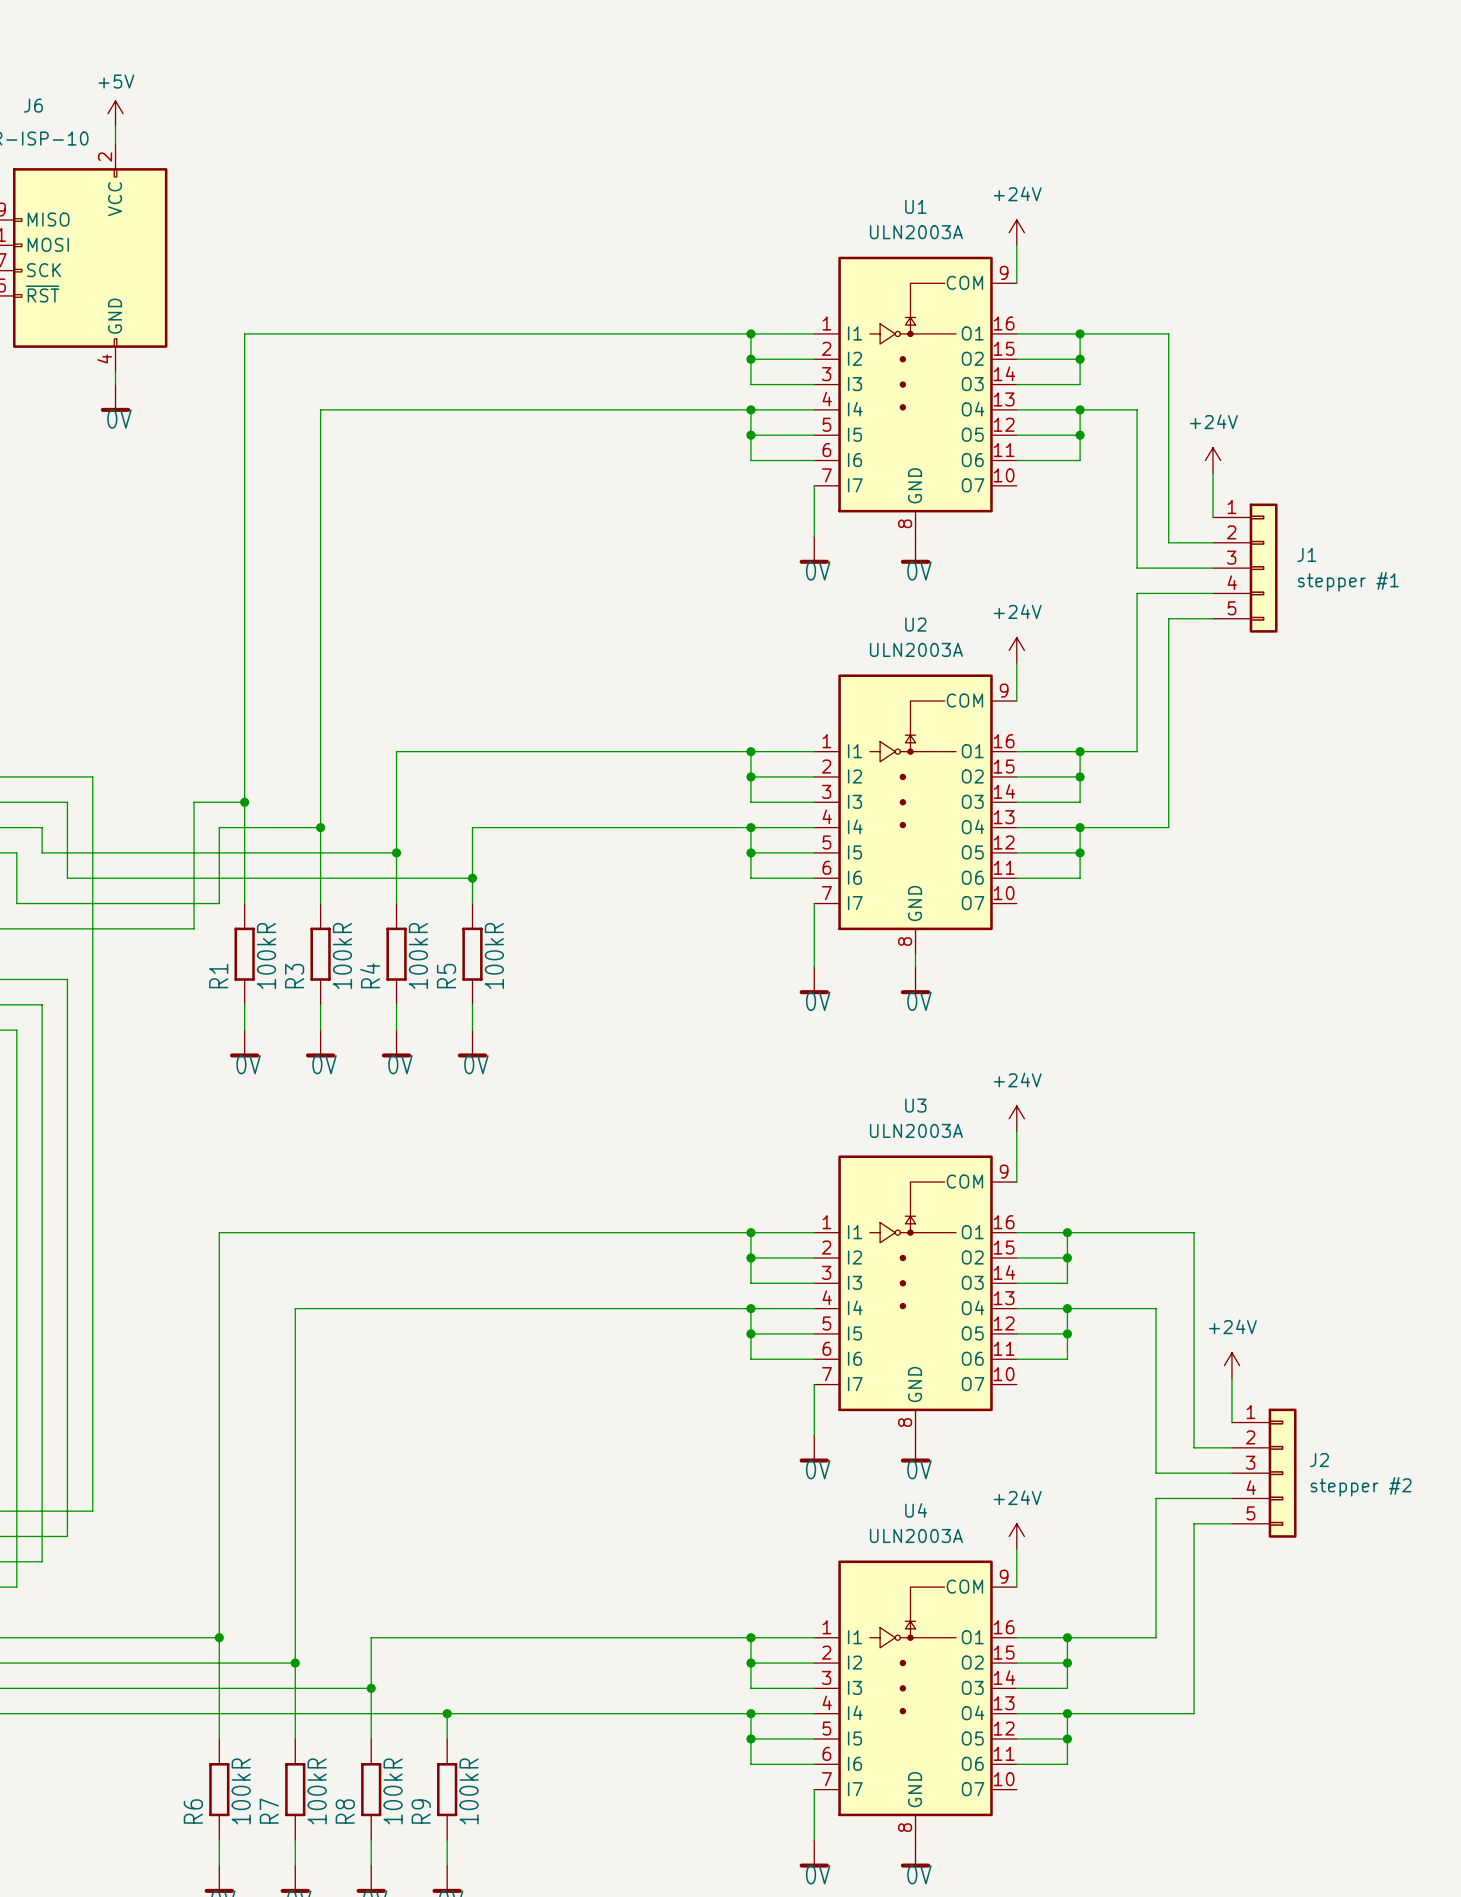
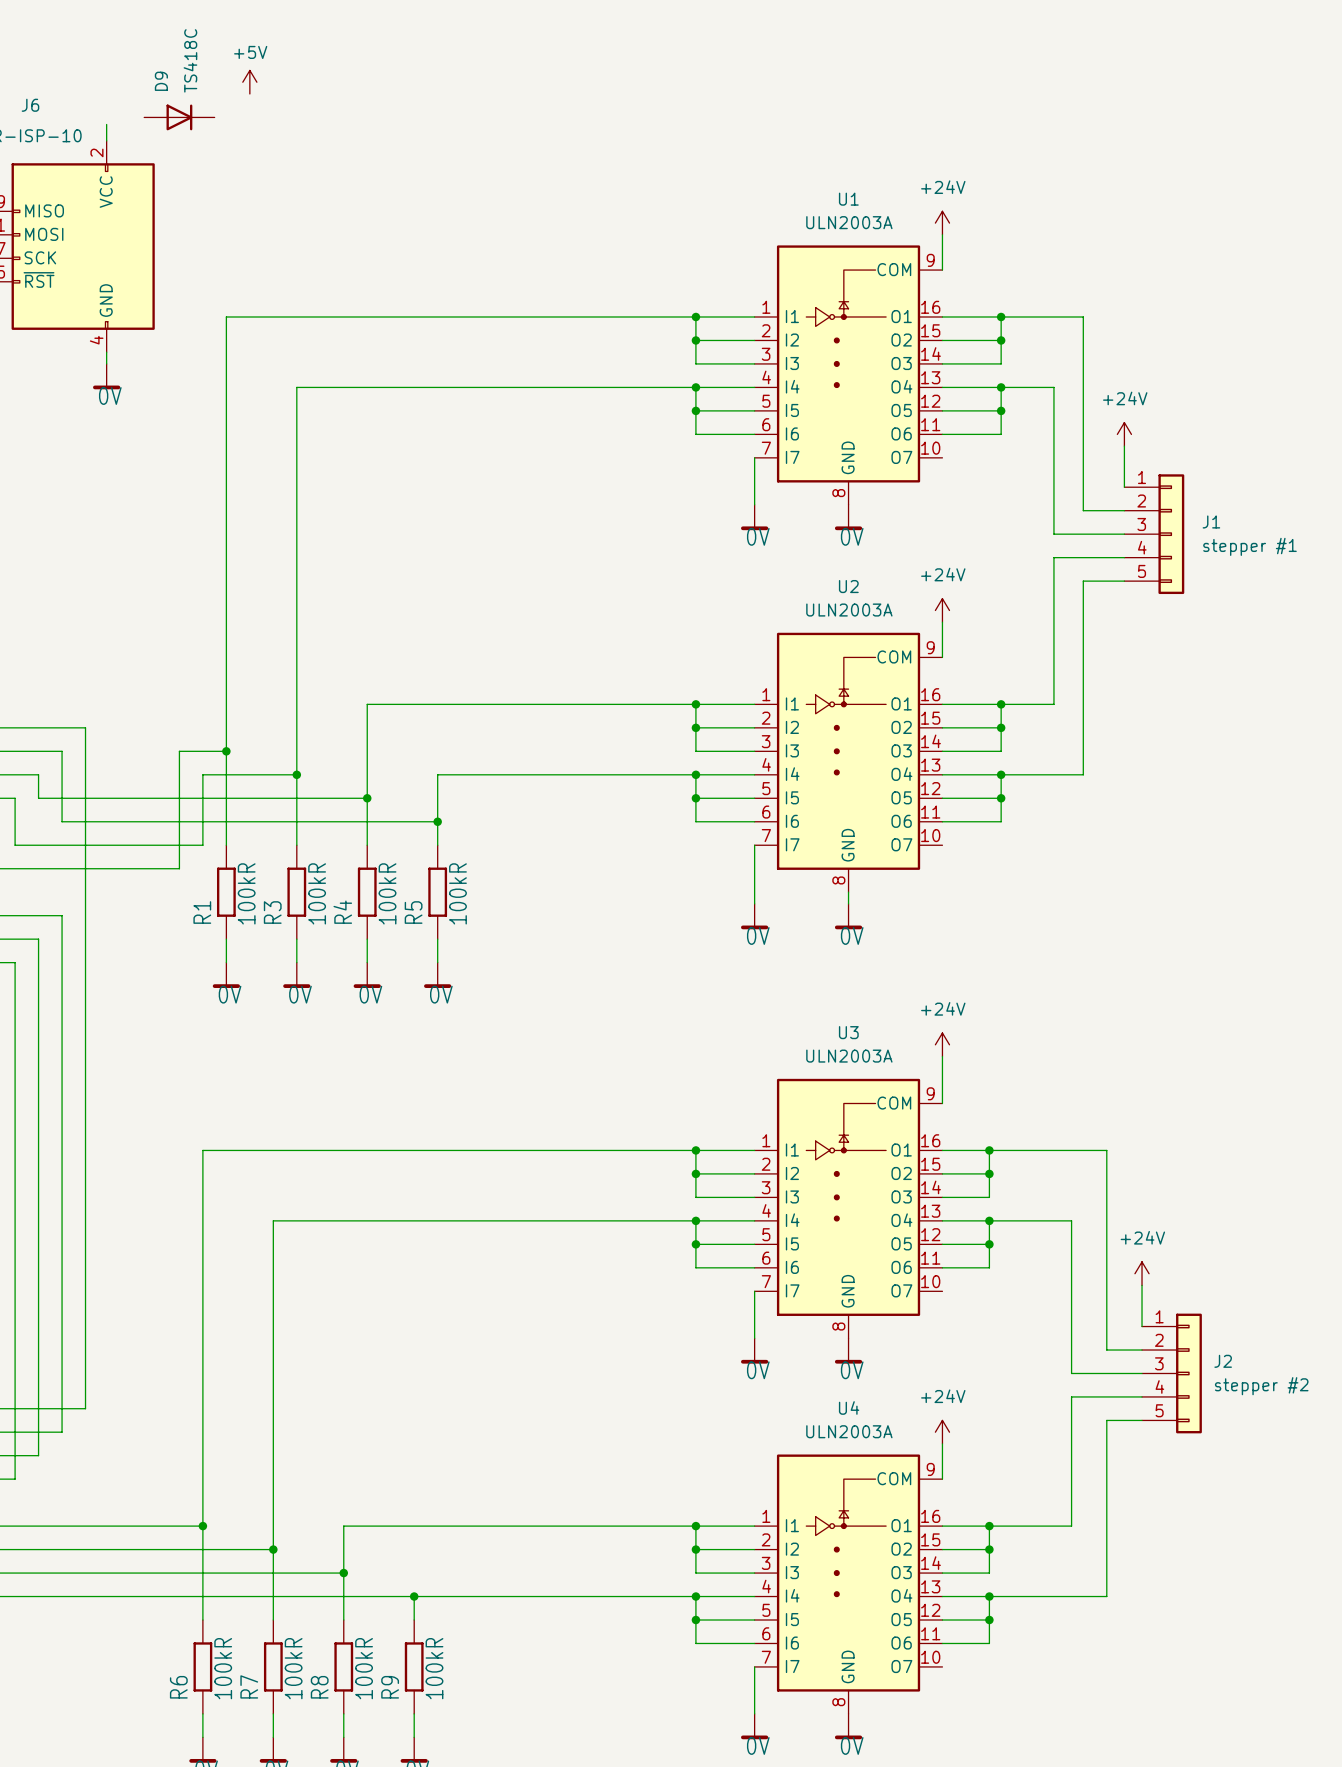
power symbol position: +5V (115, 113) -> +5V (249, 82)
D9: none -> TS418C (179, 117)

